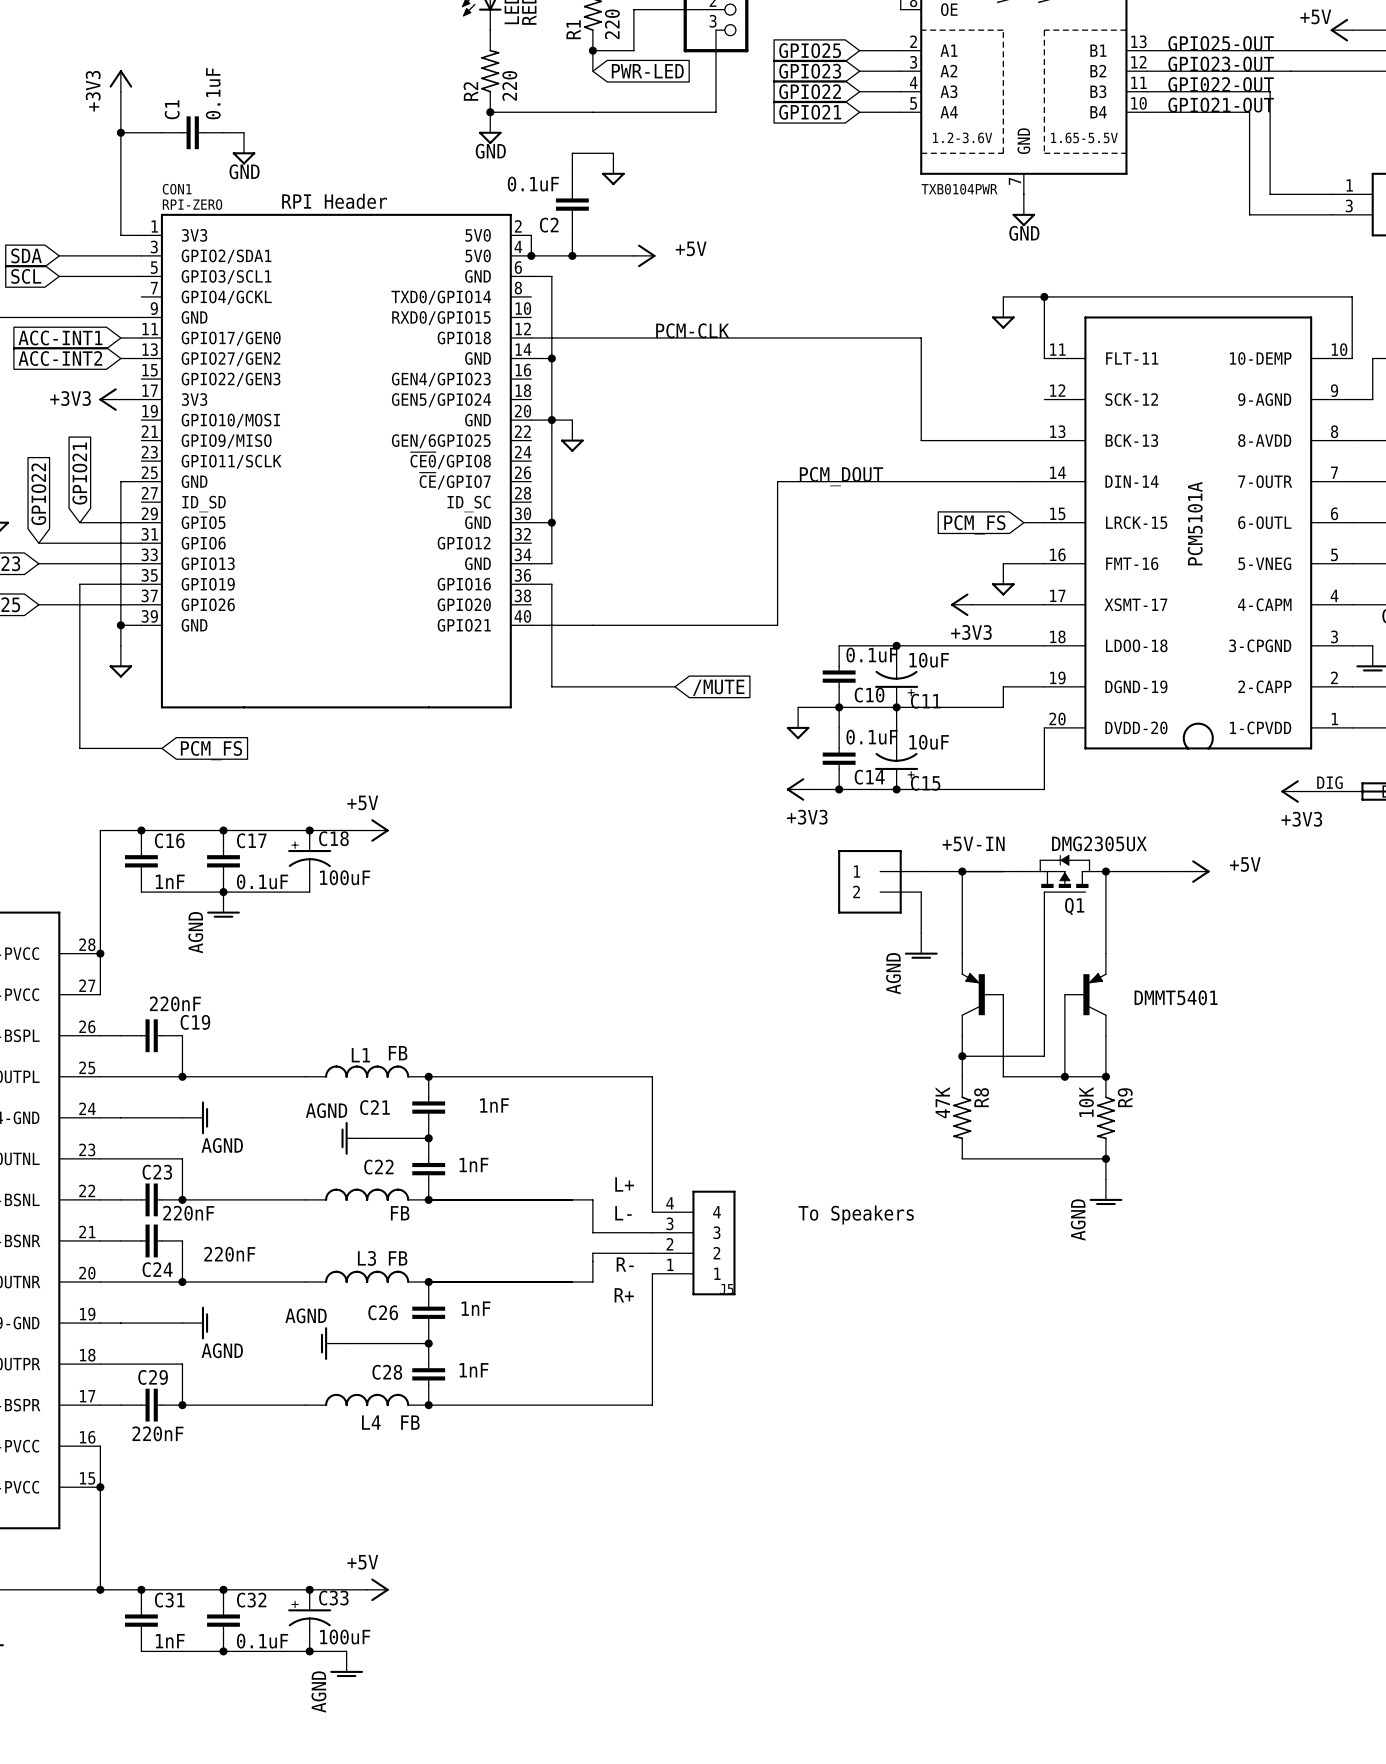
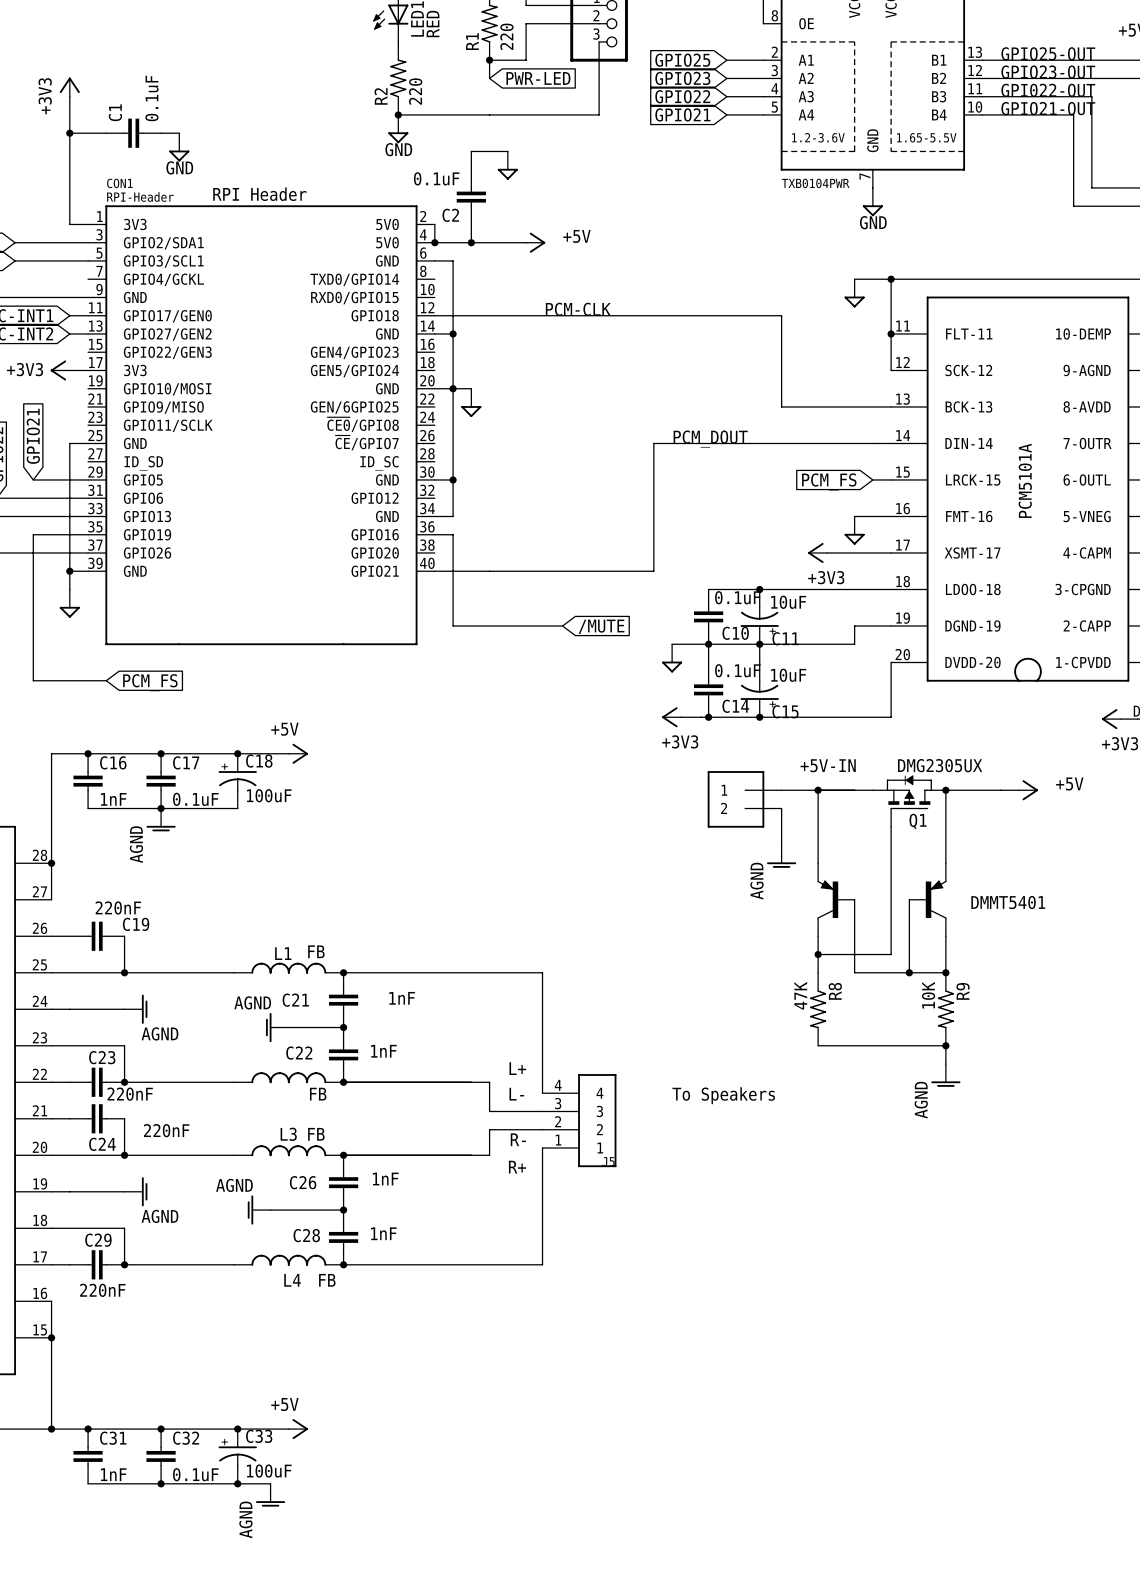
CON1 value: RPI-ZERO (192, 204) -> RPI-Header (140, 196)
wire: none -> (891, 333) (891, 370)
junction: none -> (891, 333)

